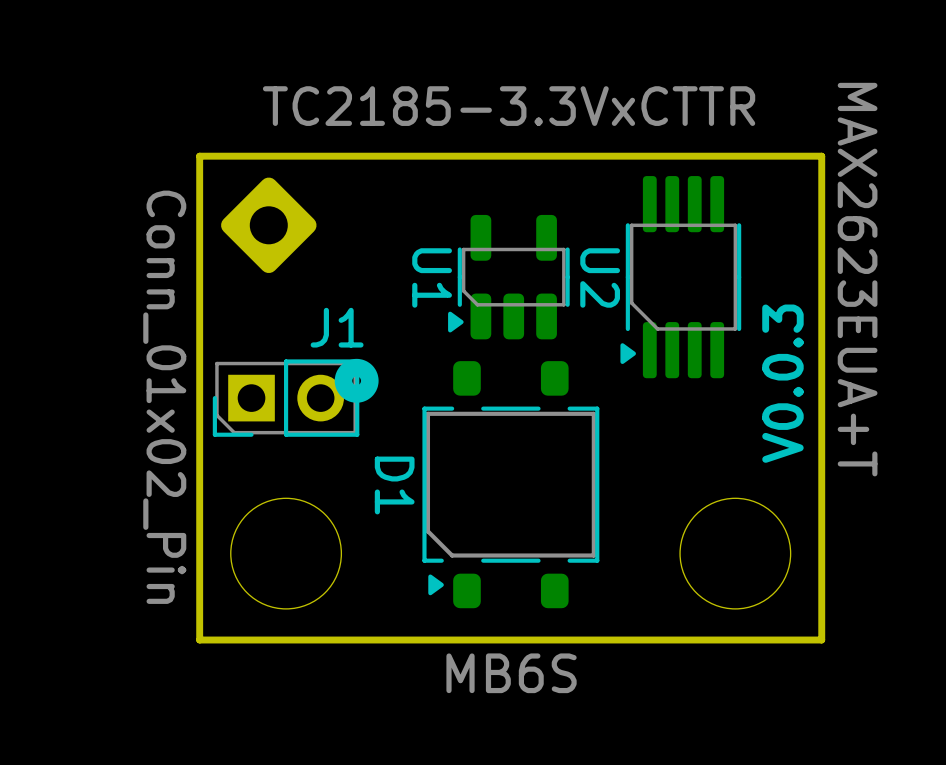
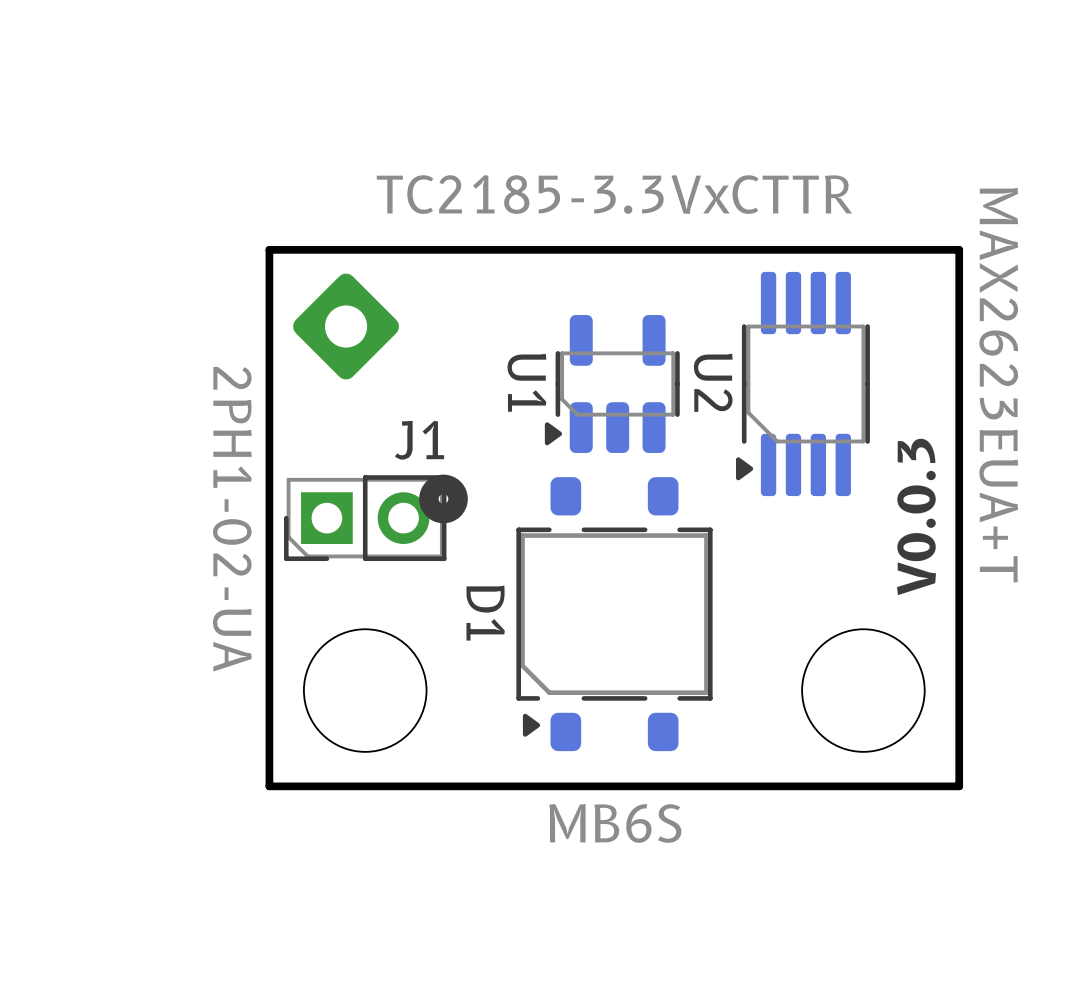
J1 value: Conn_01x02_Pin (164, 397) -> 2PH1-02-UA (232, 519)

